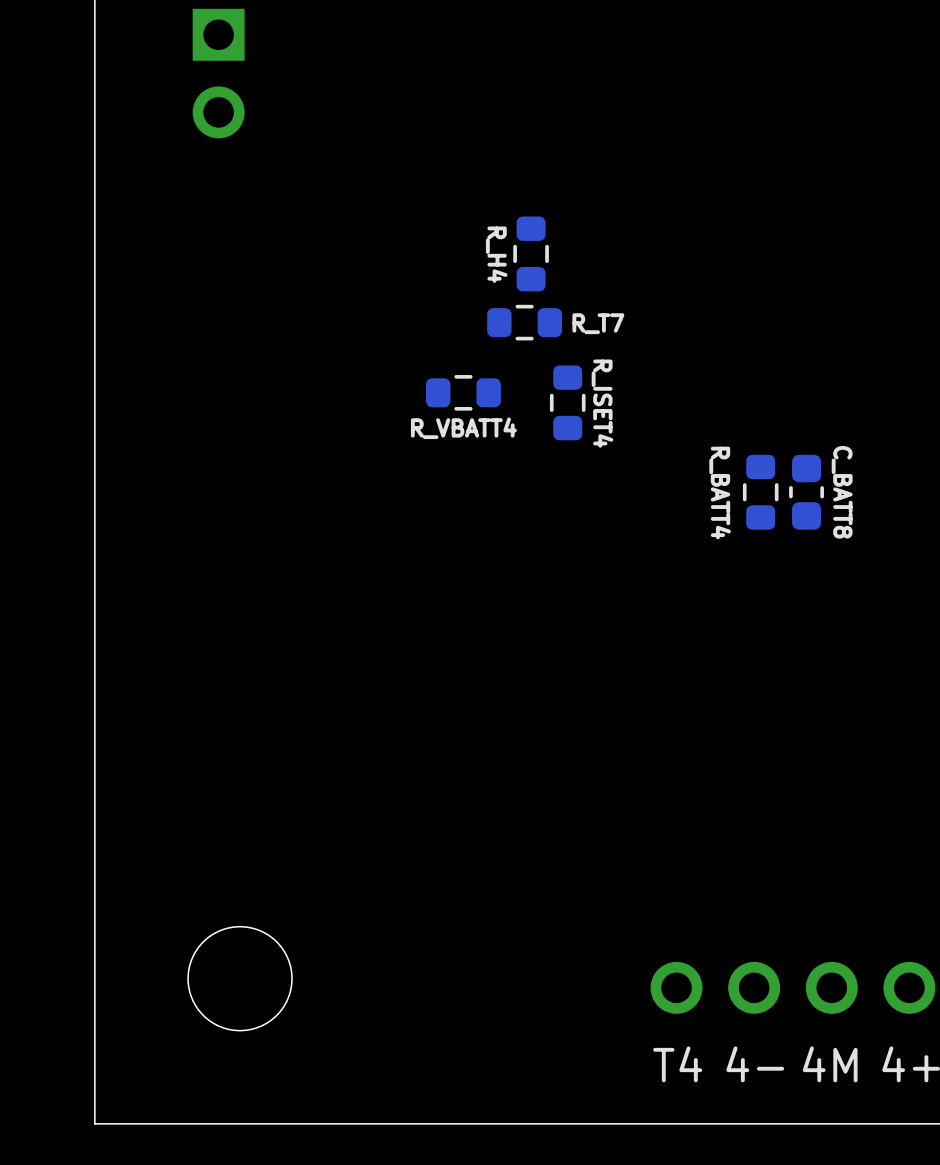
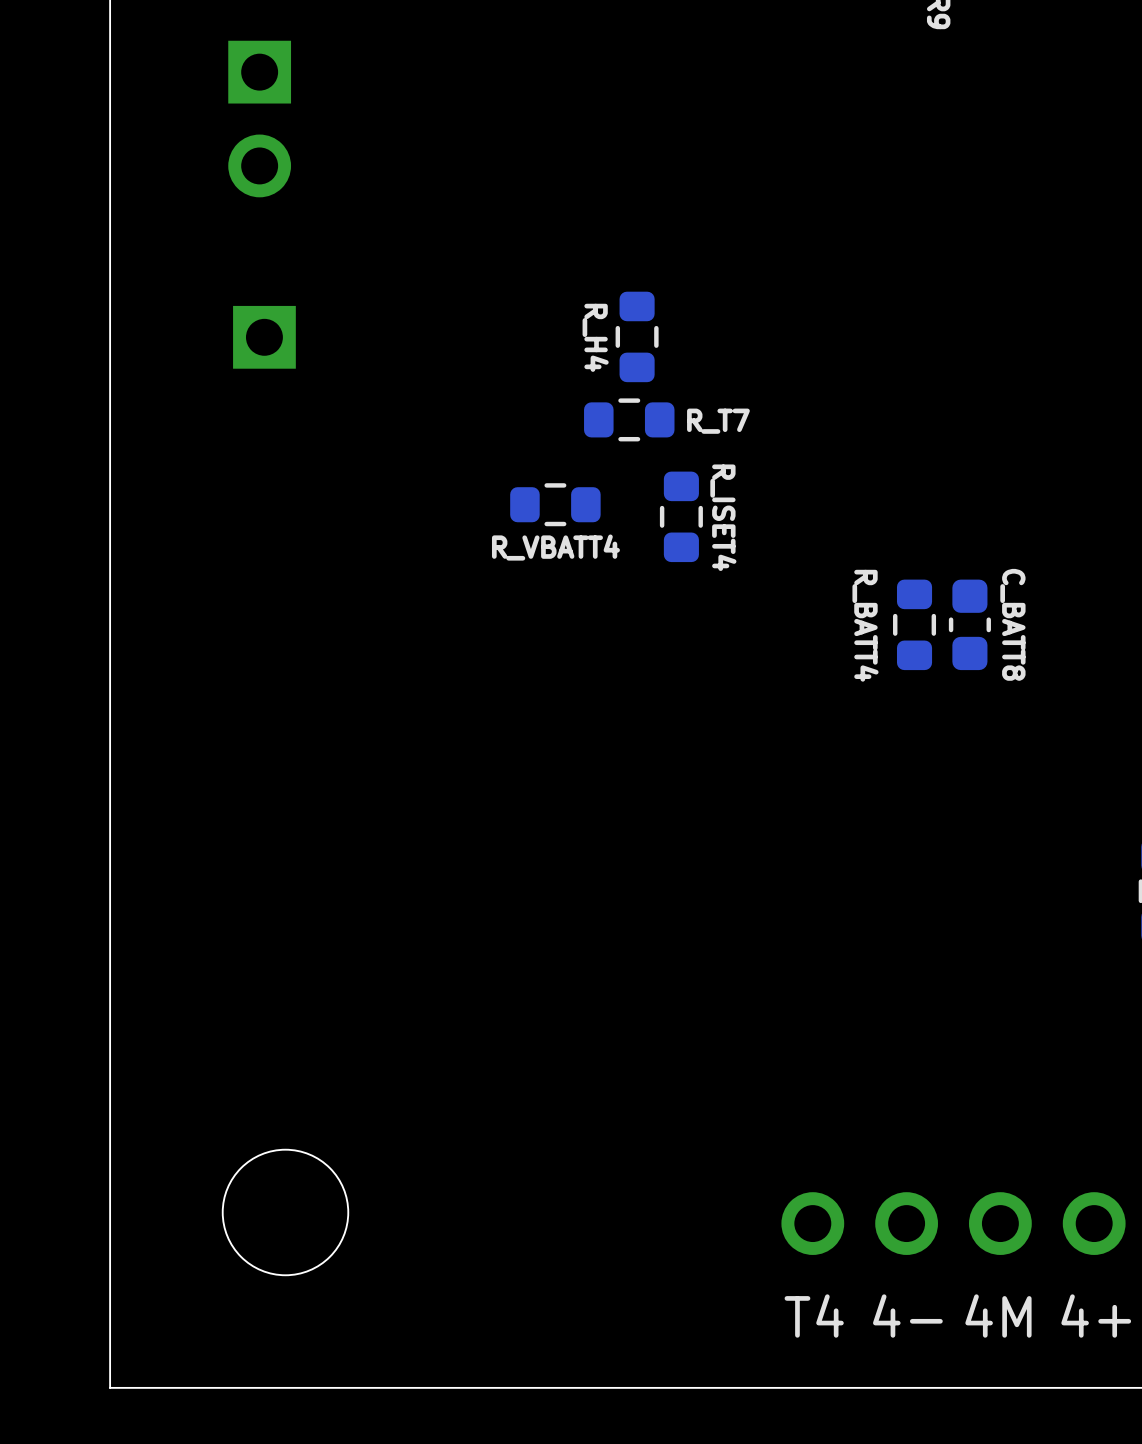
part: none -> (264, 337)

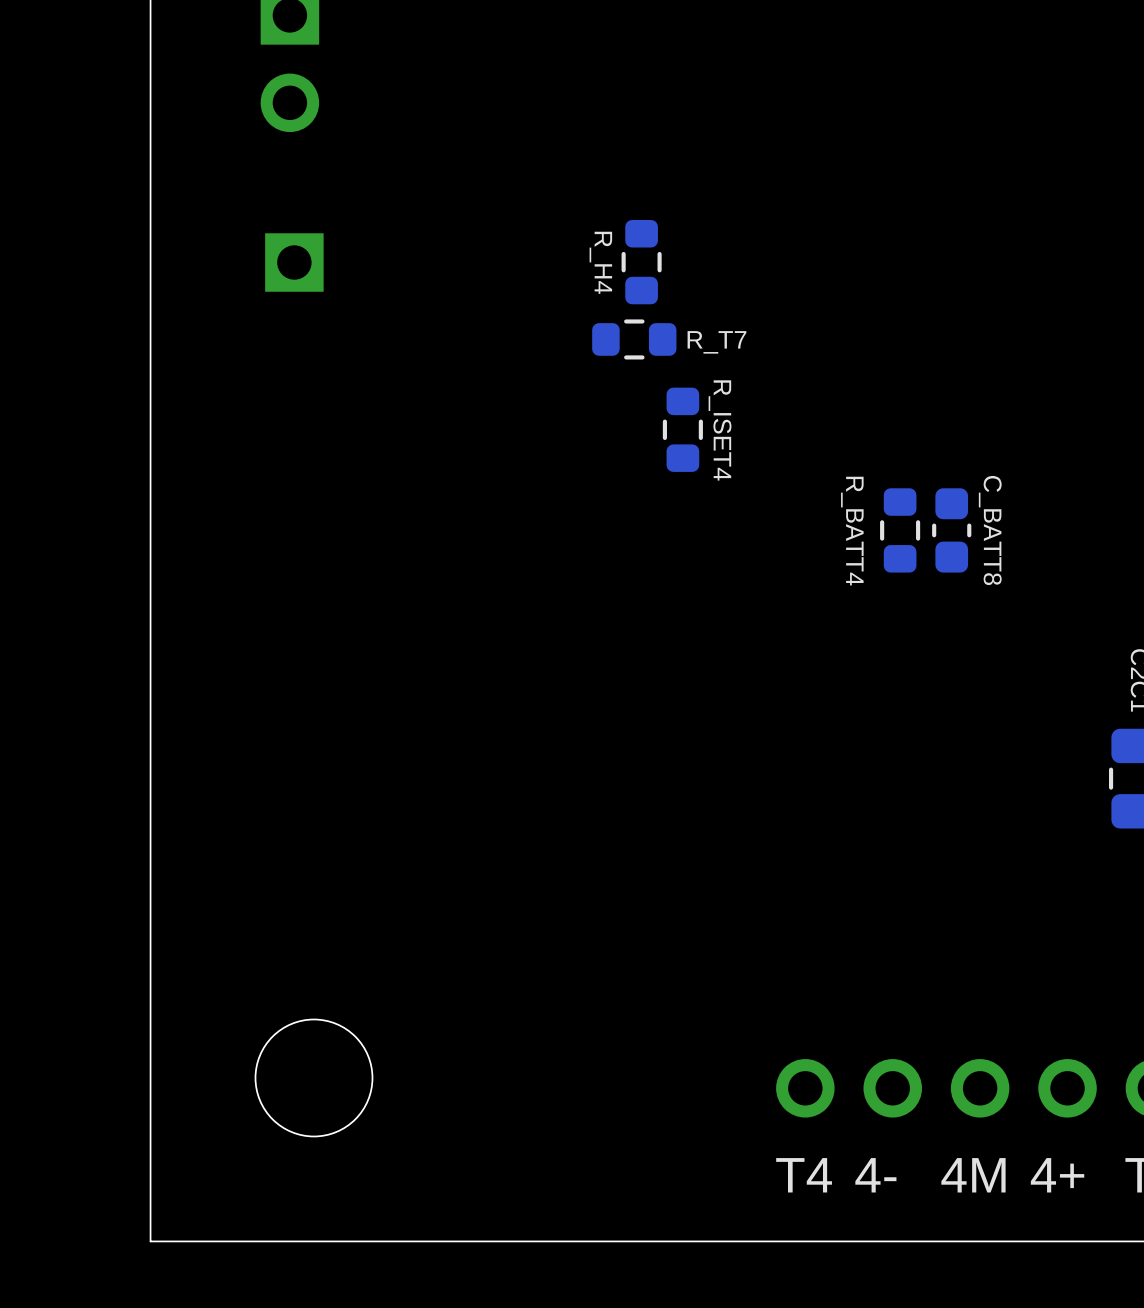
R_VBATT4: (555, 504) -> none

